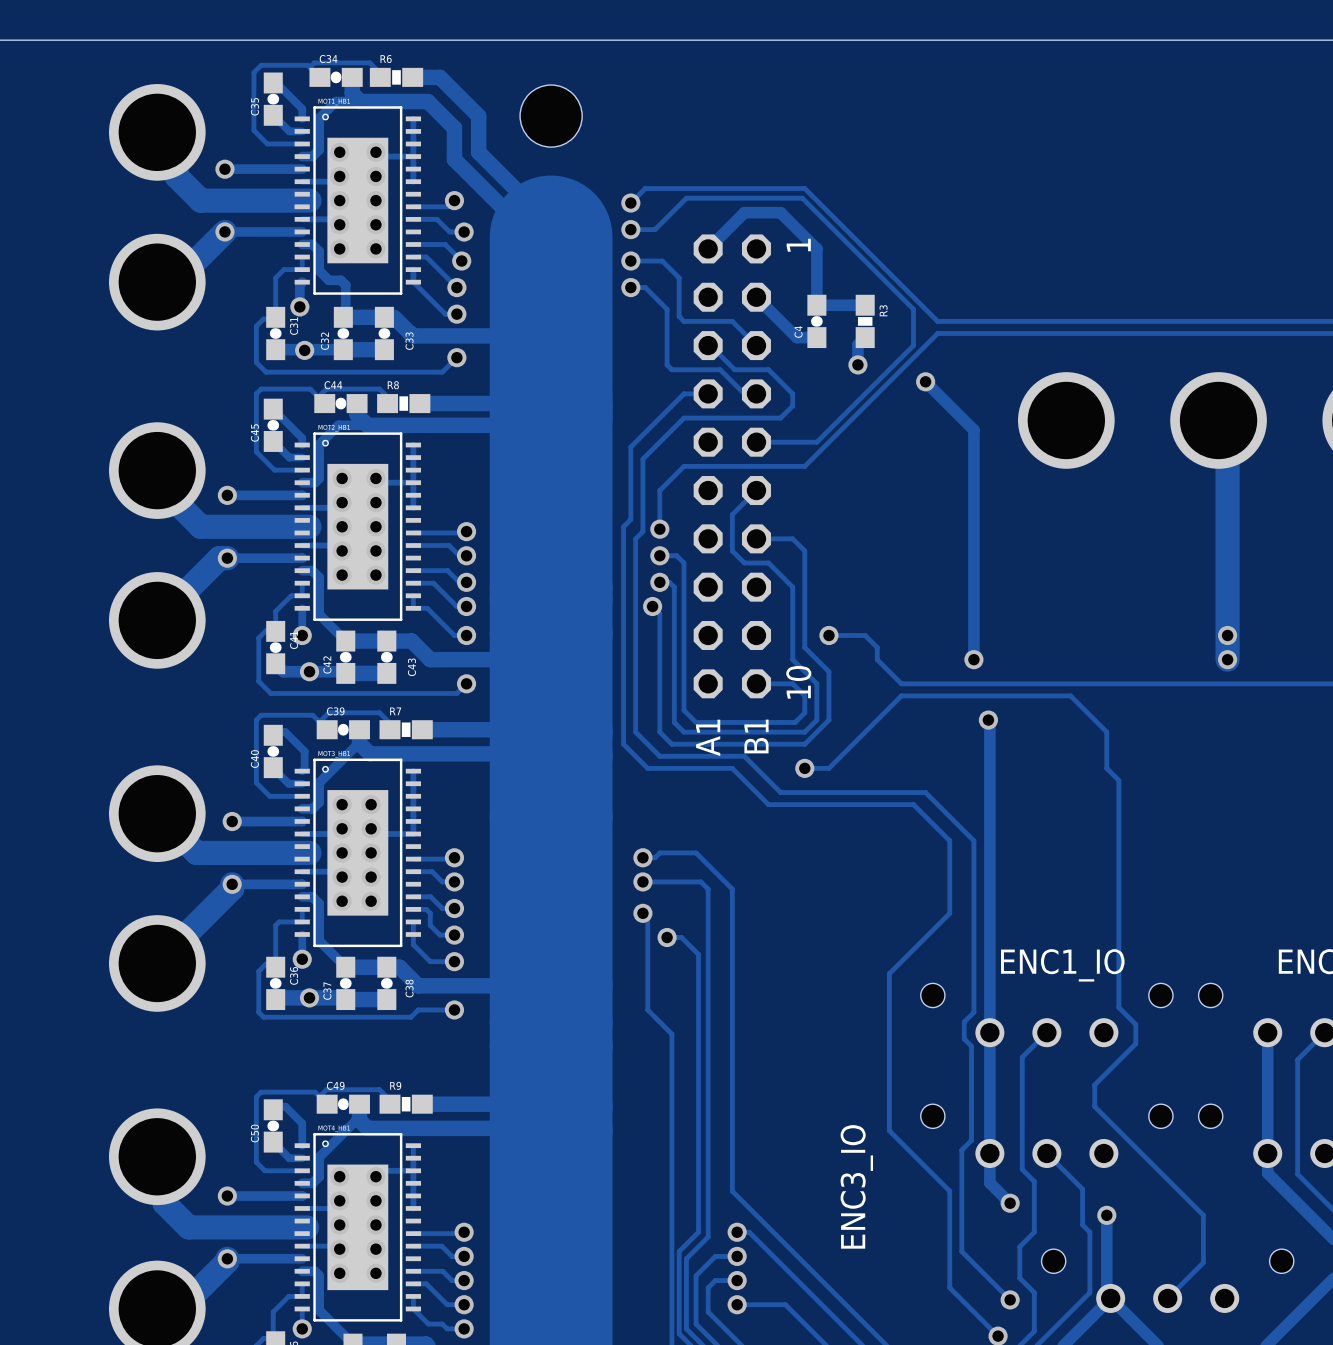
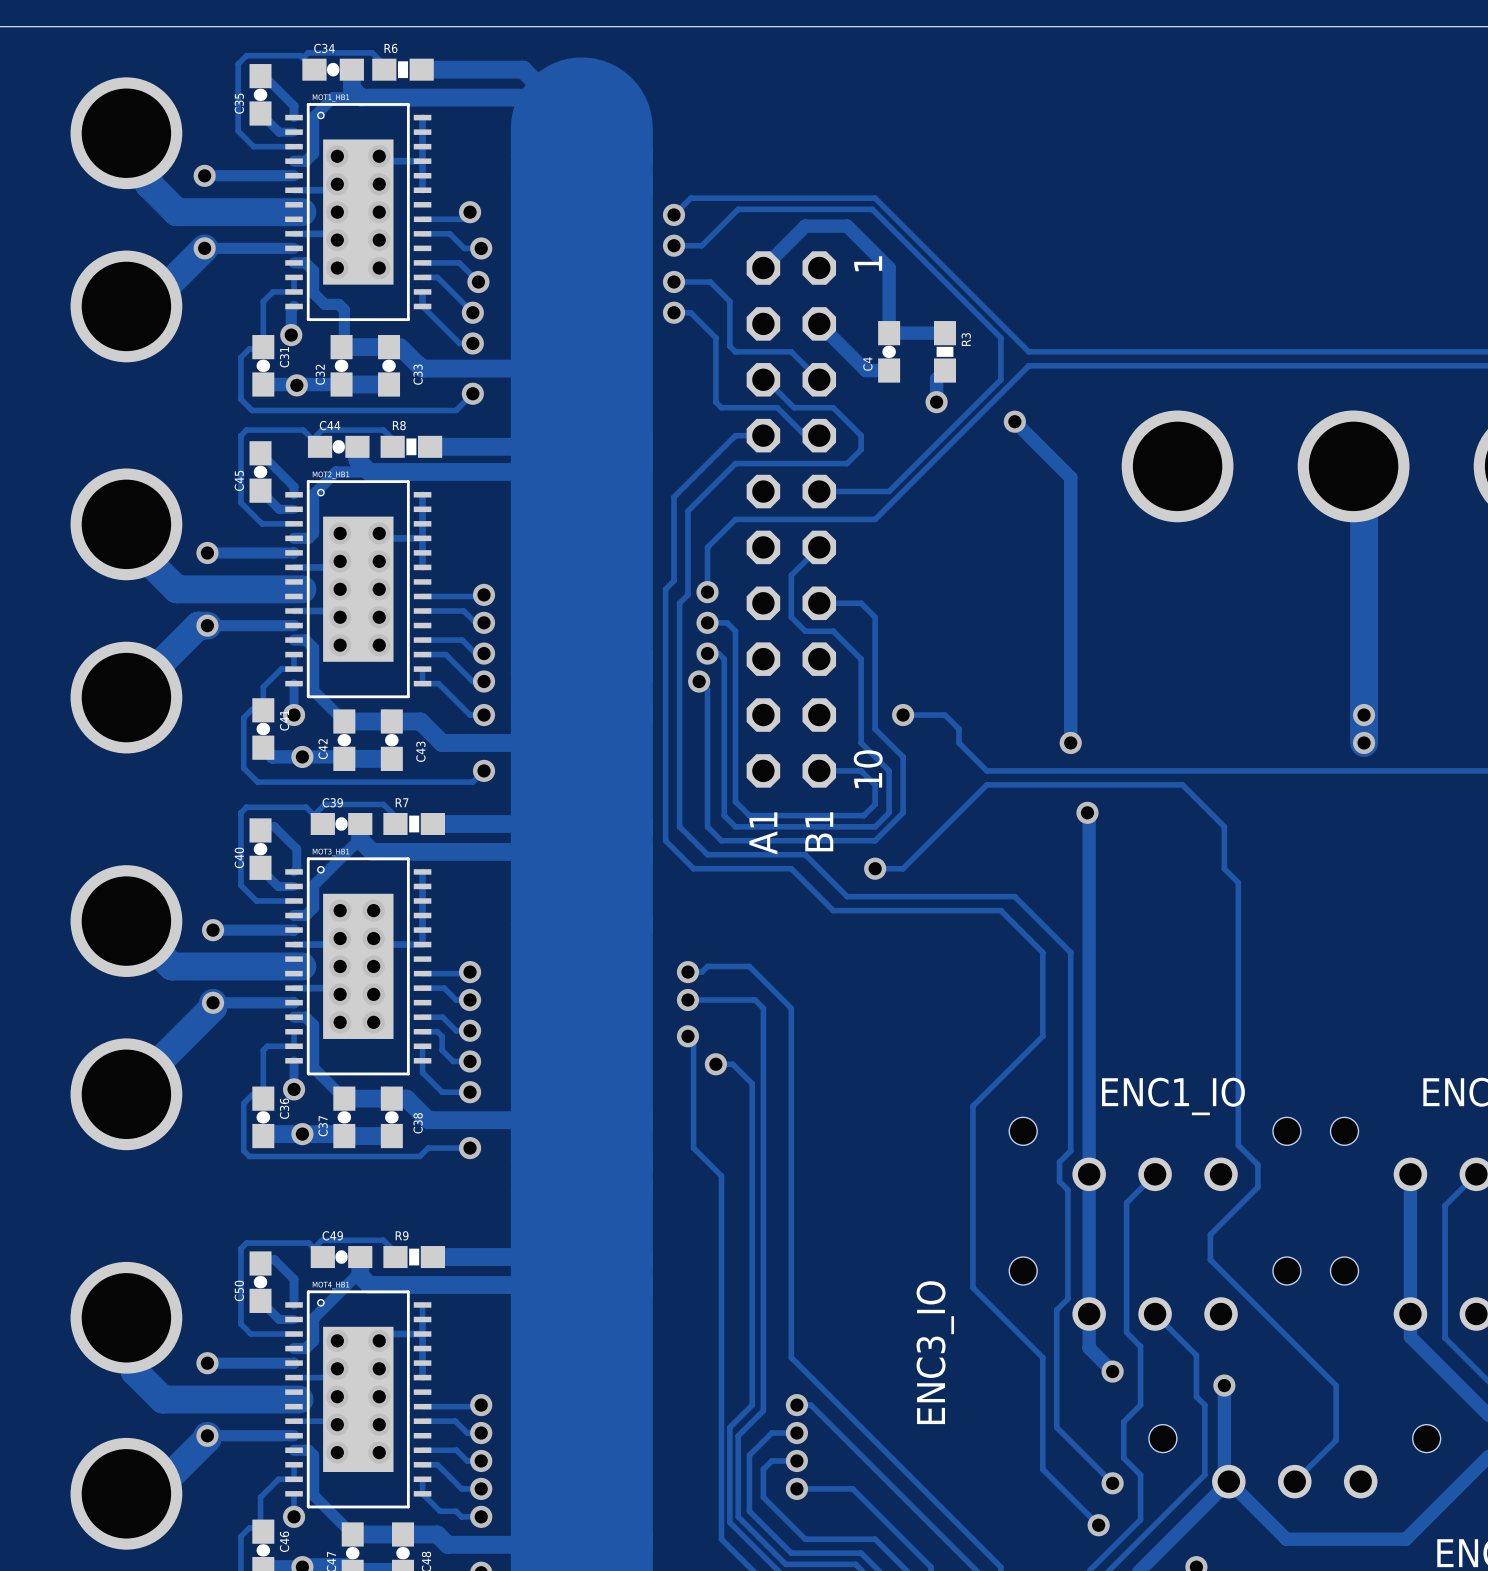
track: (439, 77) (478, 116) (478, 152) (551, 224) -> (453, 69) (523, 69) (581, 128) (581, 240)
track: (427, 101) (454, 128) (454, 159) (519, 224) (539, 224) (551, 236) -> (439, 97) (551, 97)
part: (551, 116) -> none

